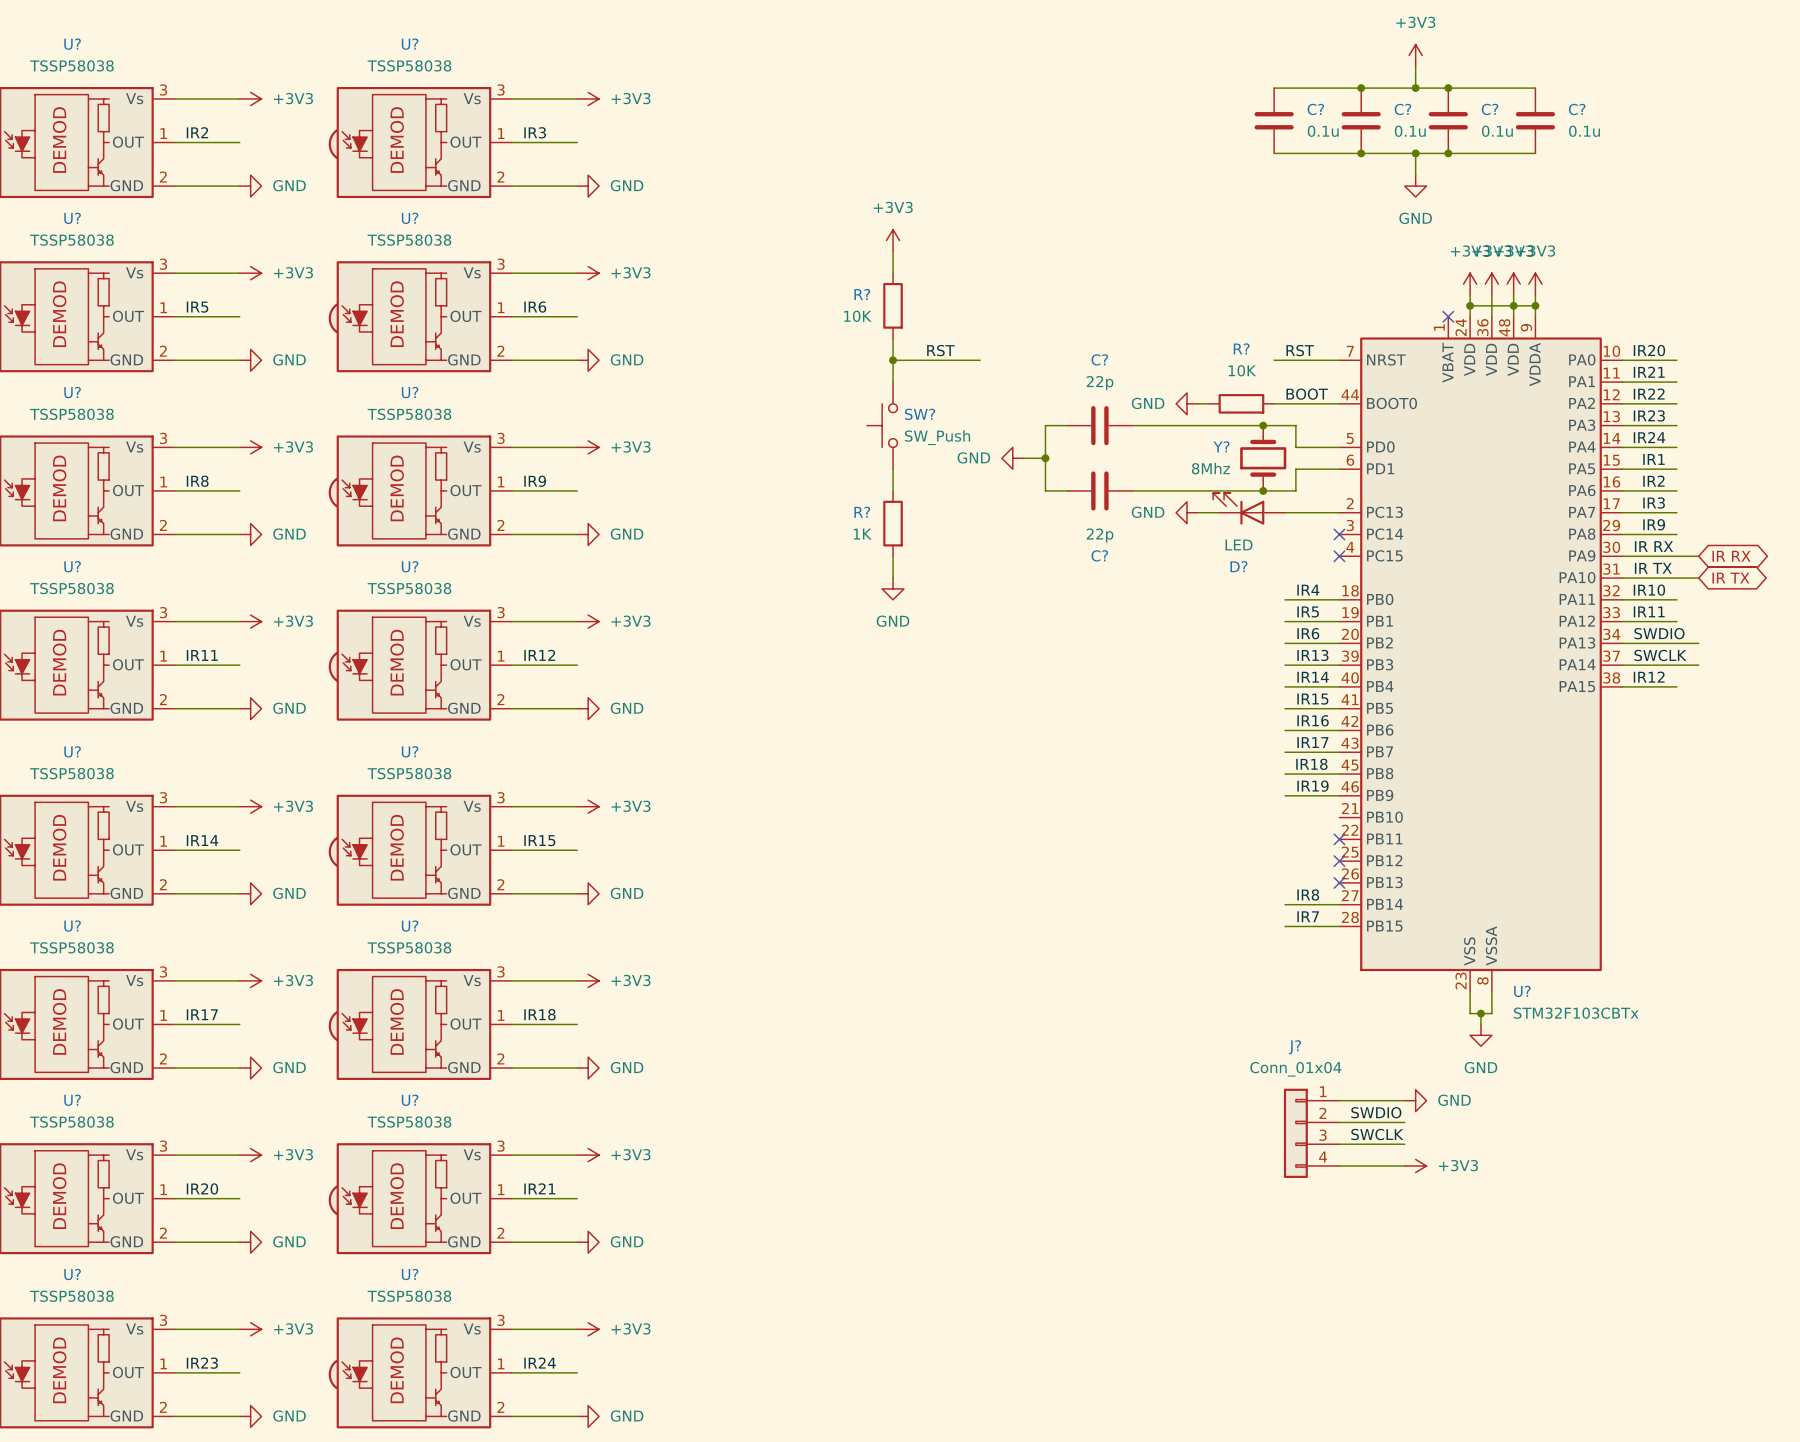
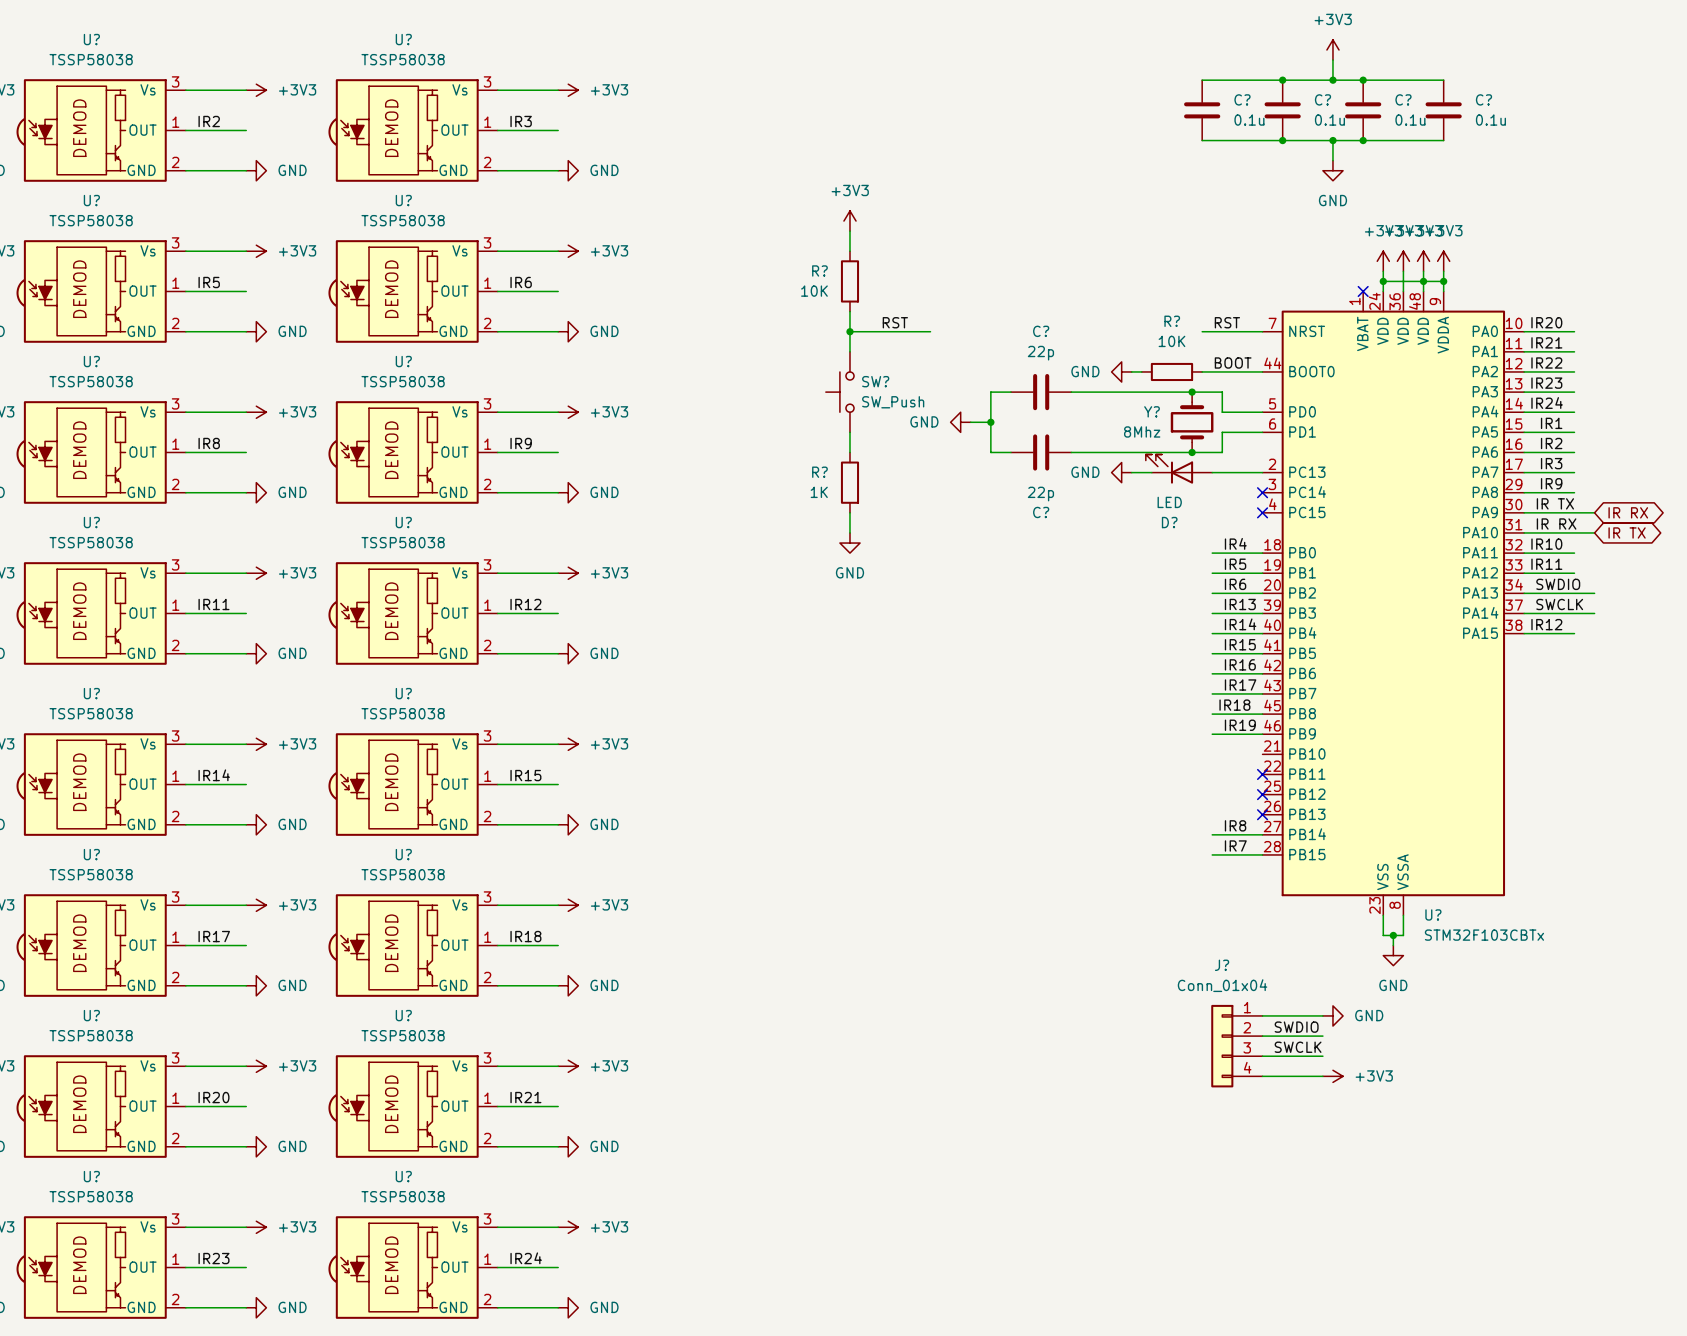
label: IR RX (1653, 546) -> IR TX (1555, 503)
label: IR TX (1653, 568) -> IR RX (1556, 523)

